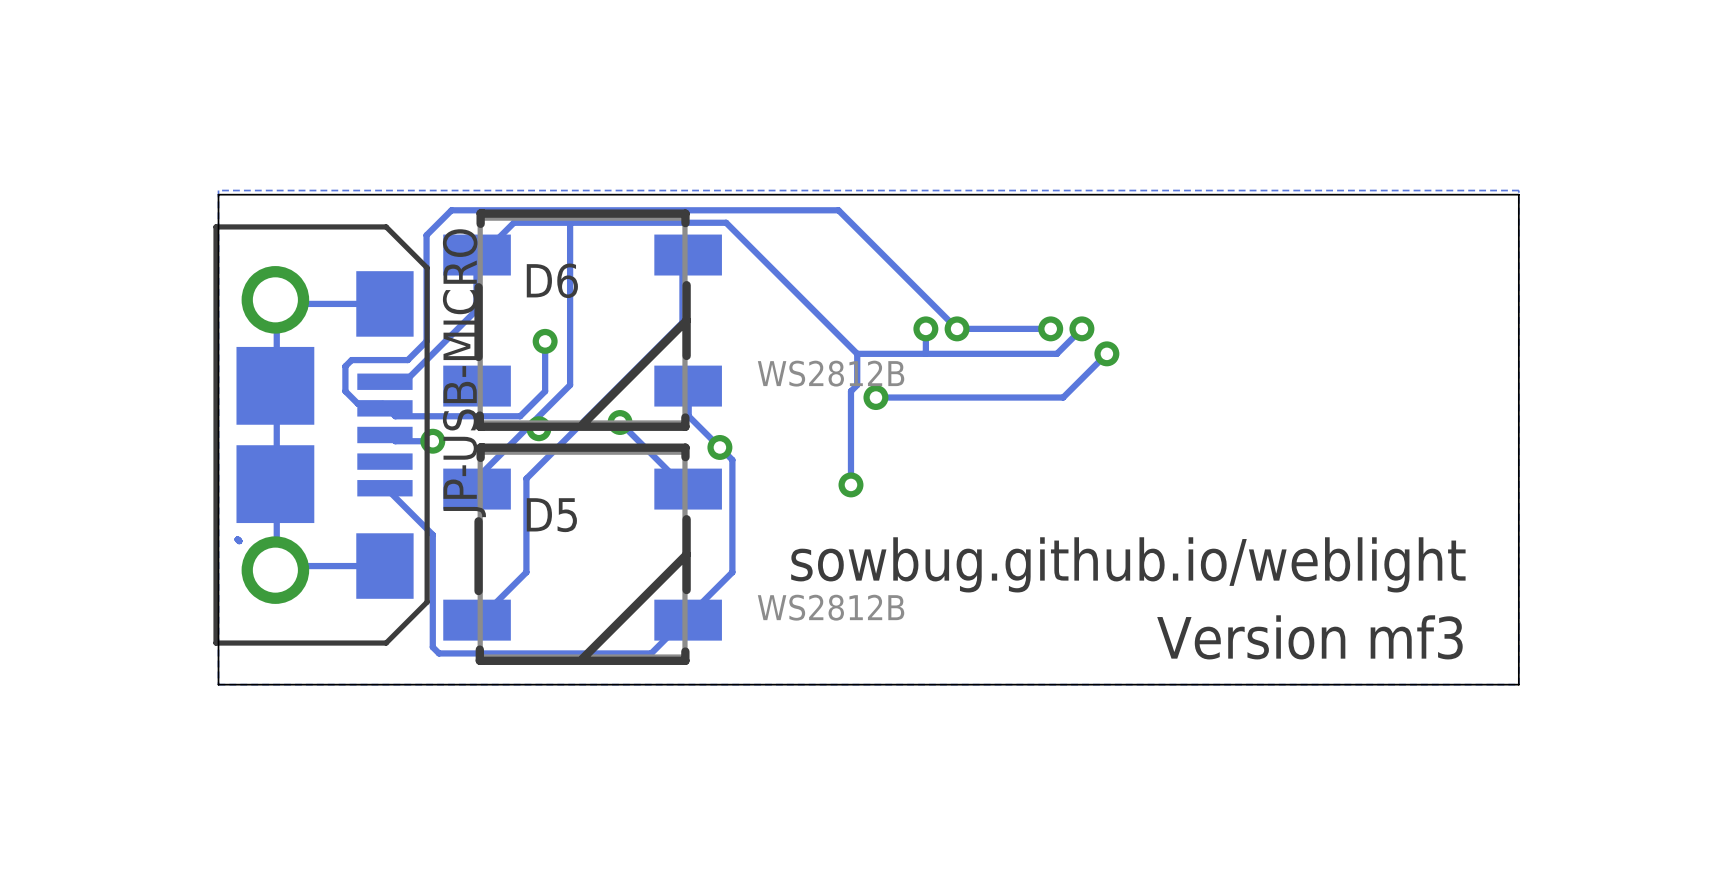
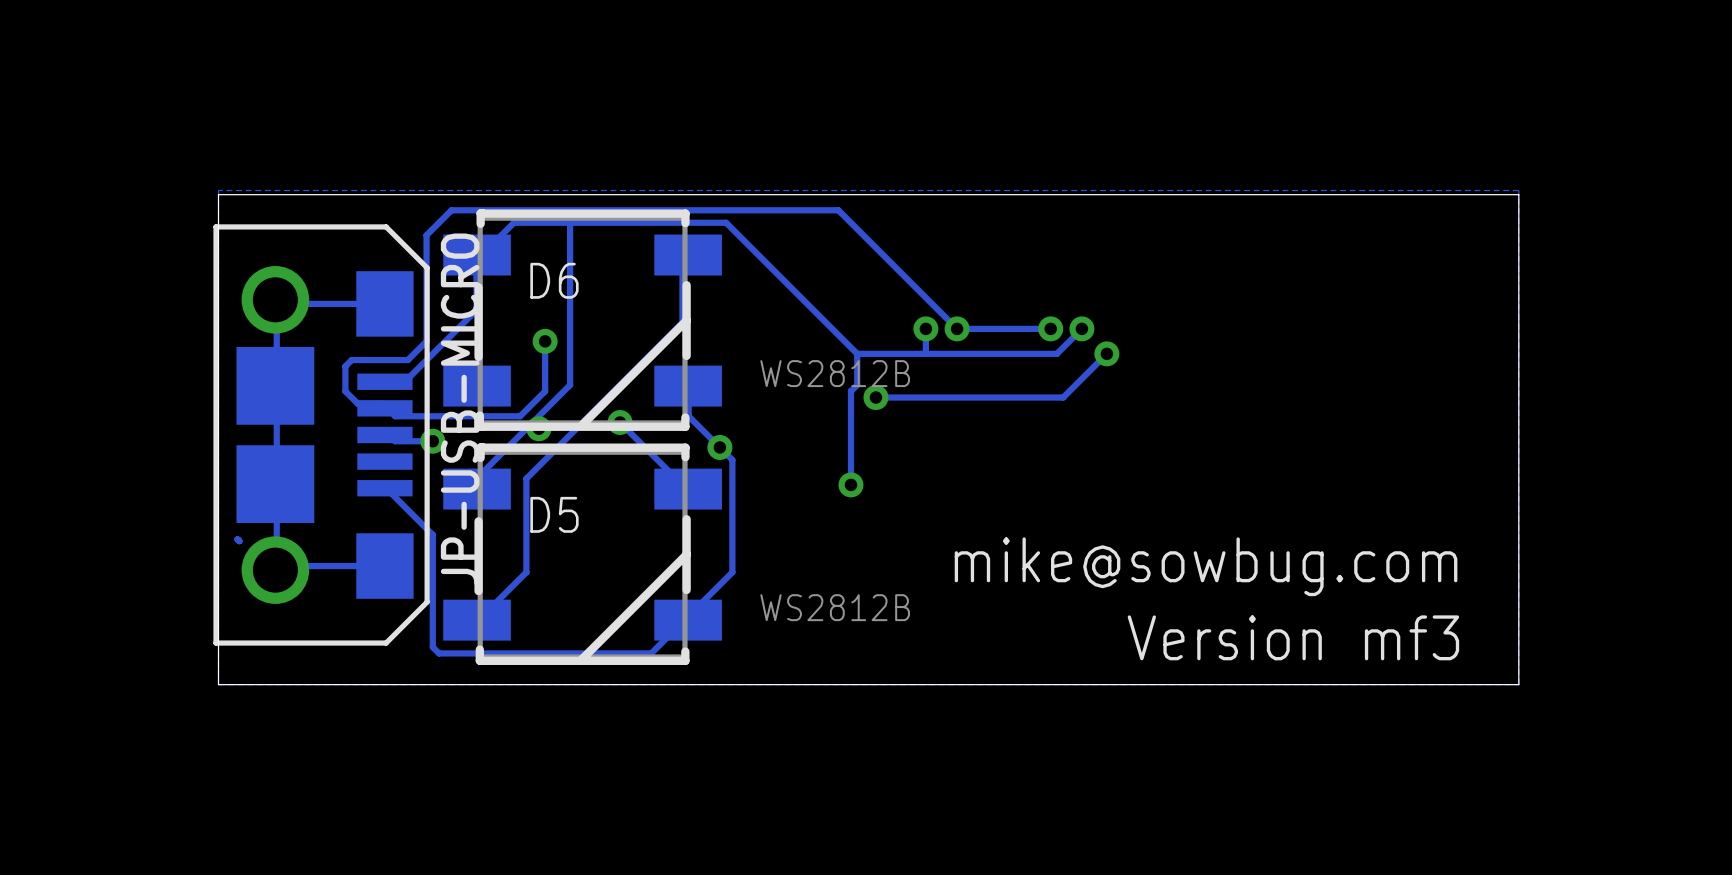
text: sowbug.github.io/weblight (1128, 564) -> mike@sowbug.com (1206, 566)

